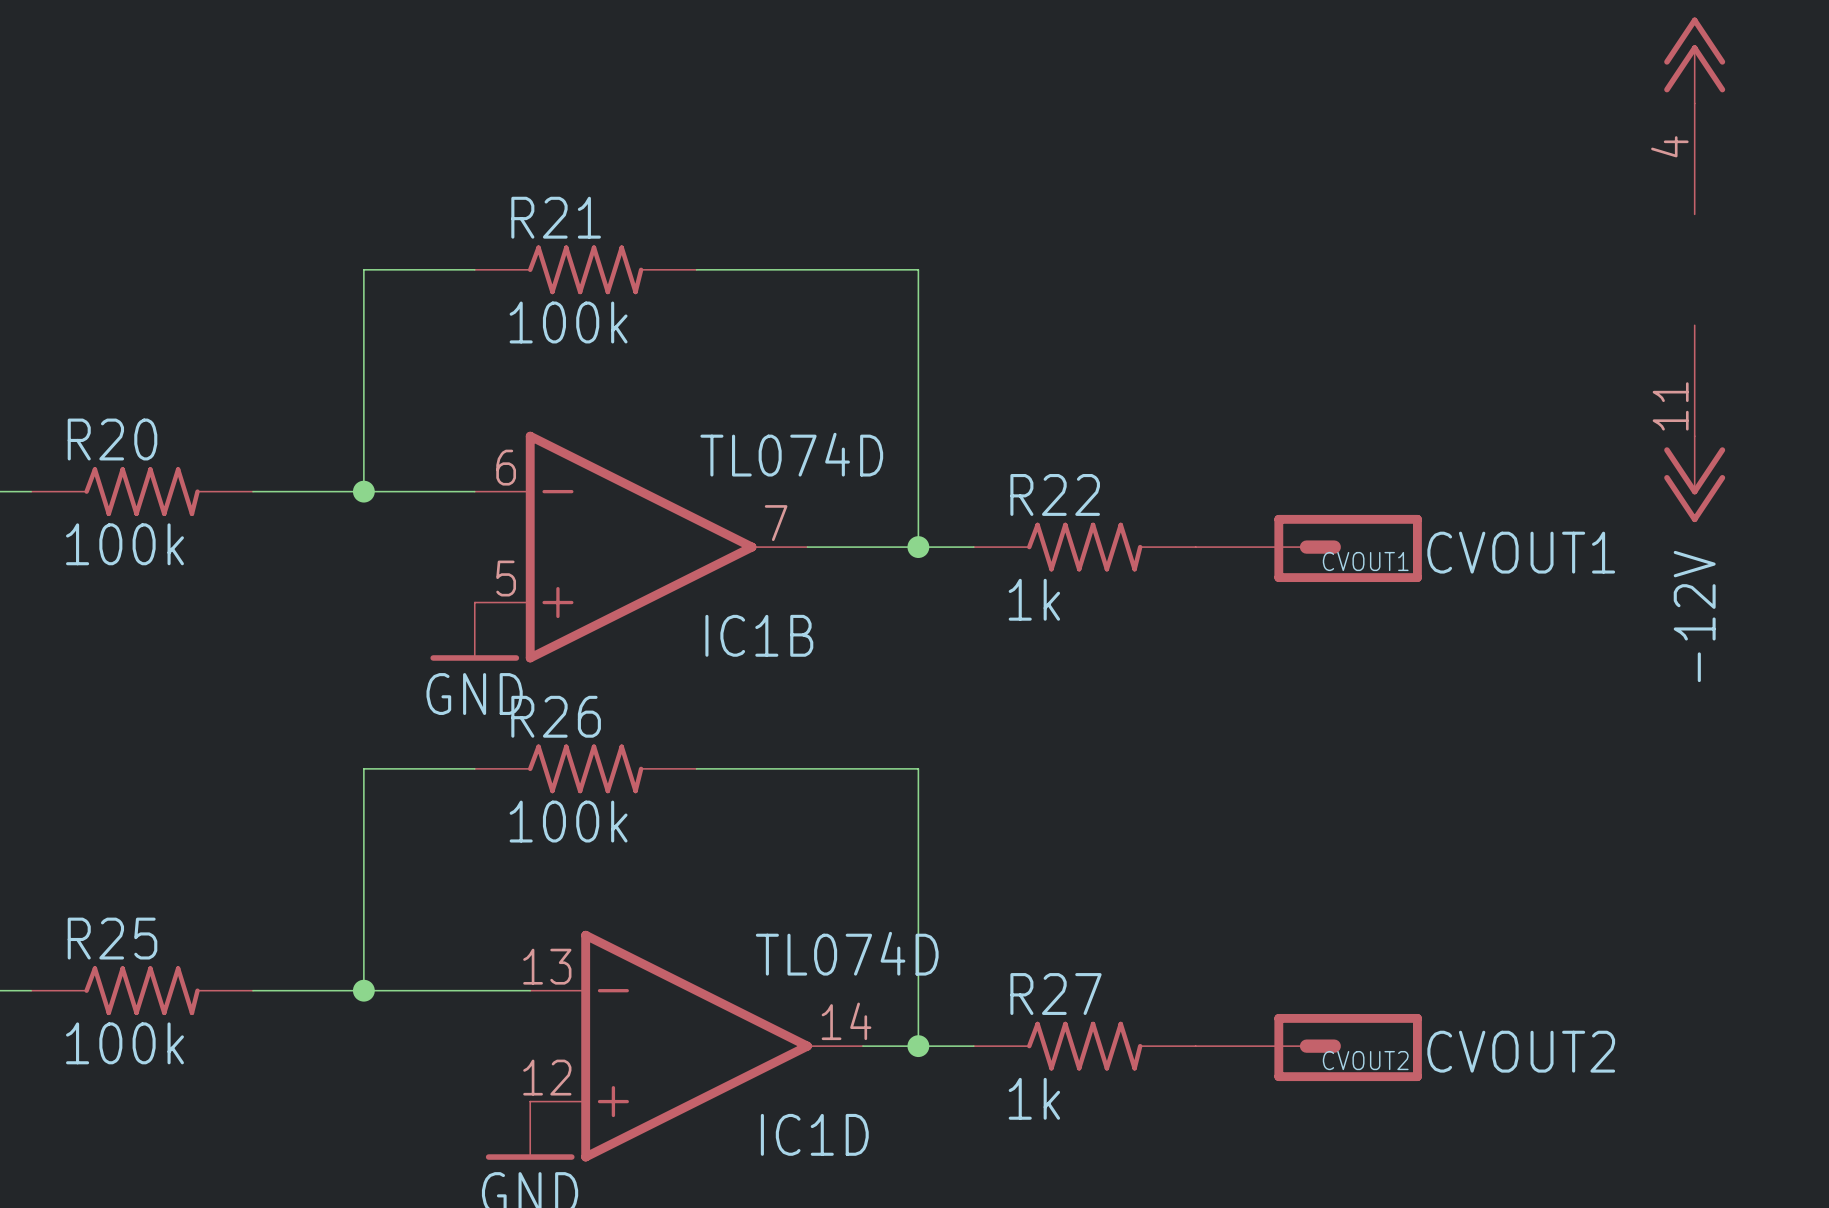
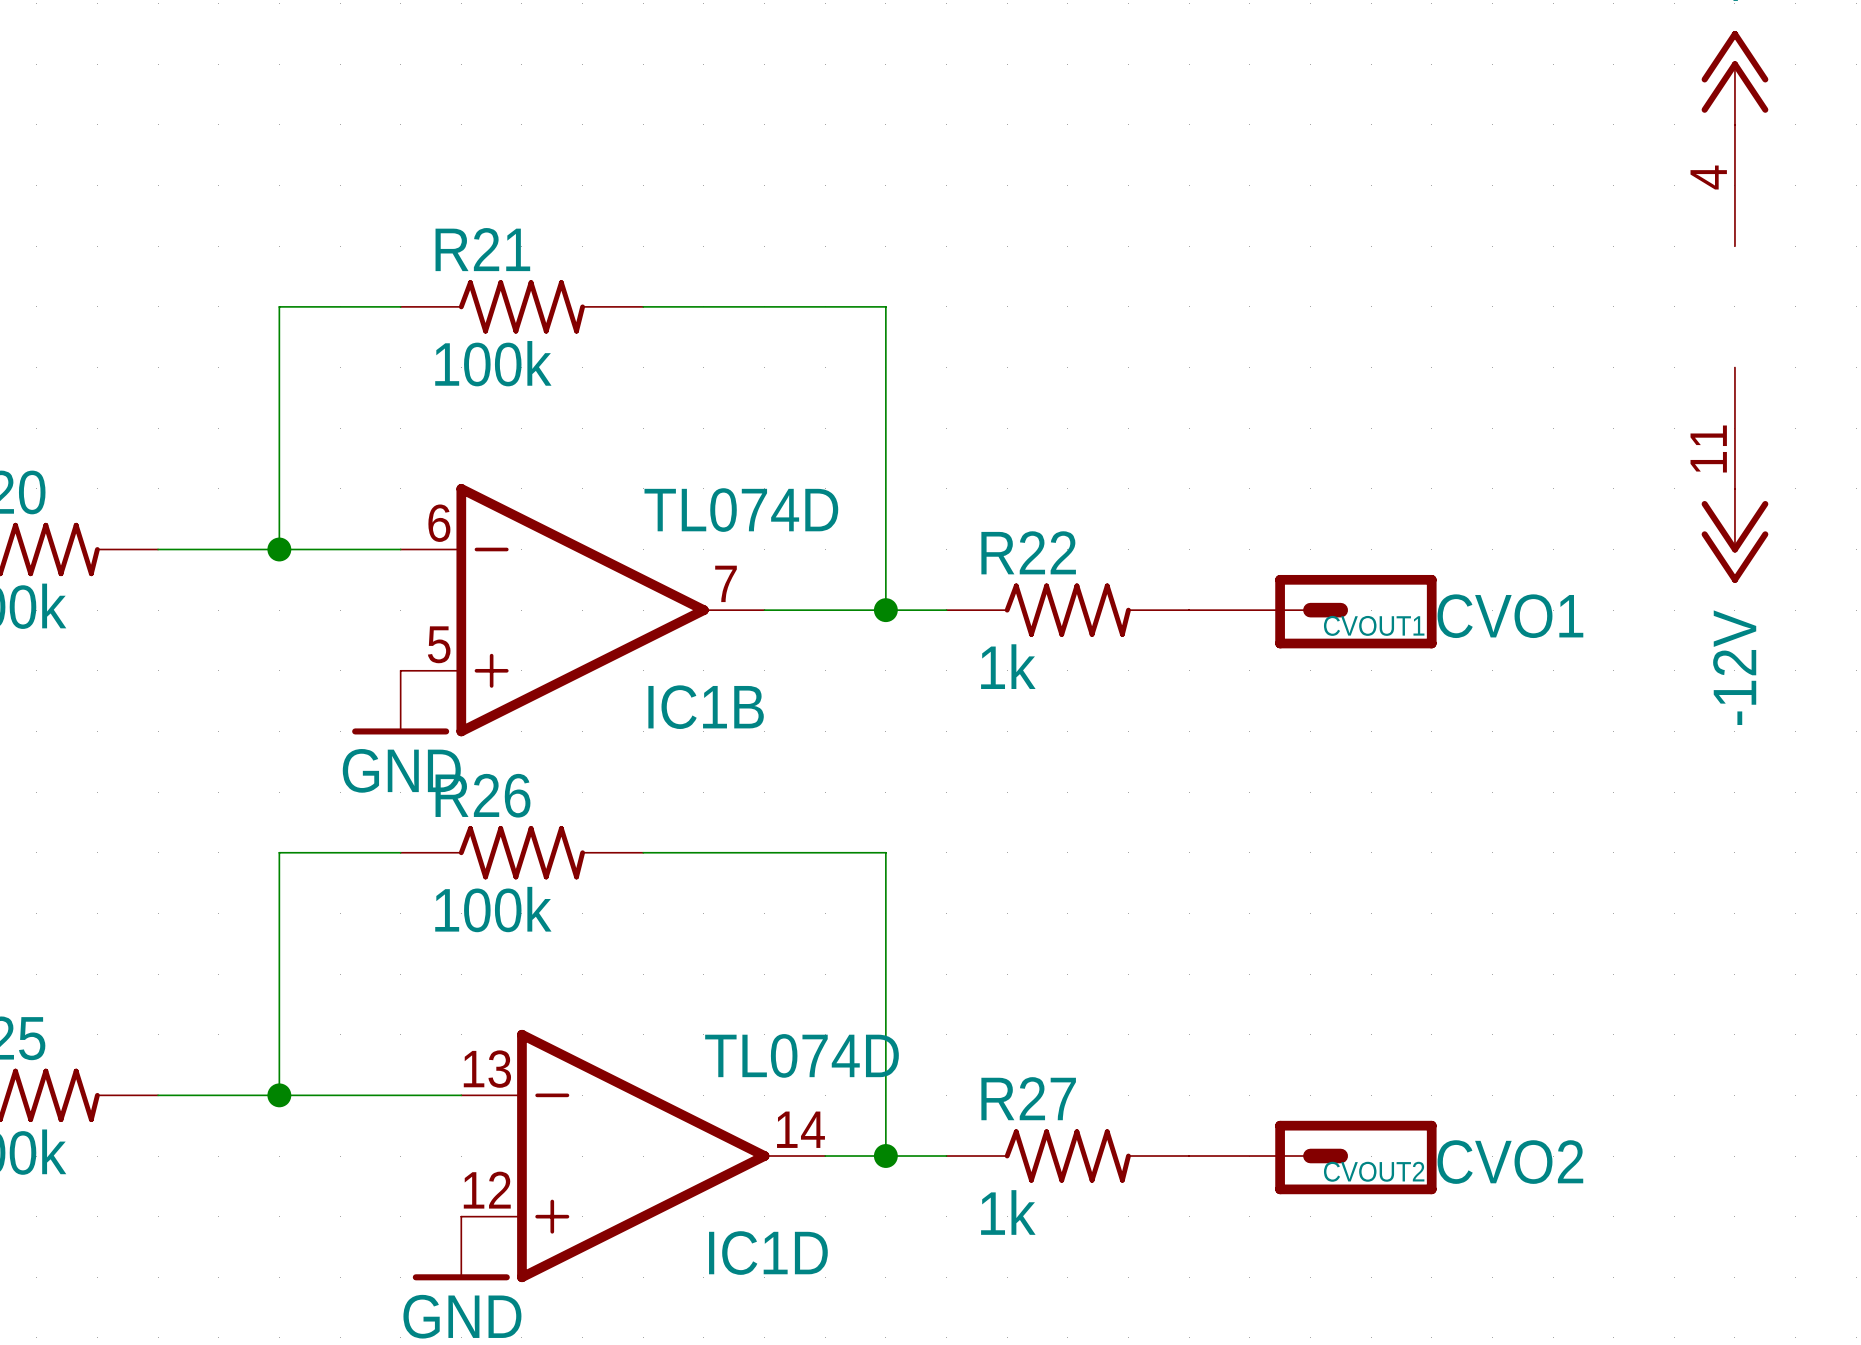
CVOUT1 value: CVOUT1 (1521, 552) -> CVO1 (1510, 616)
CVOUT2 value: CVOUT2 (1521, 1051) -> CVO2 (1510, 1162)

